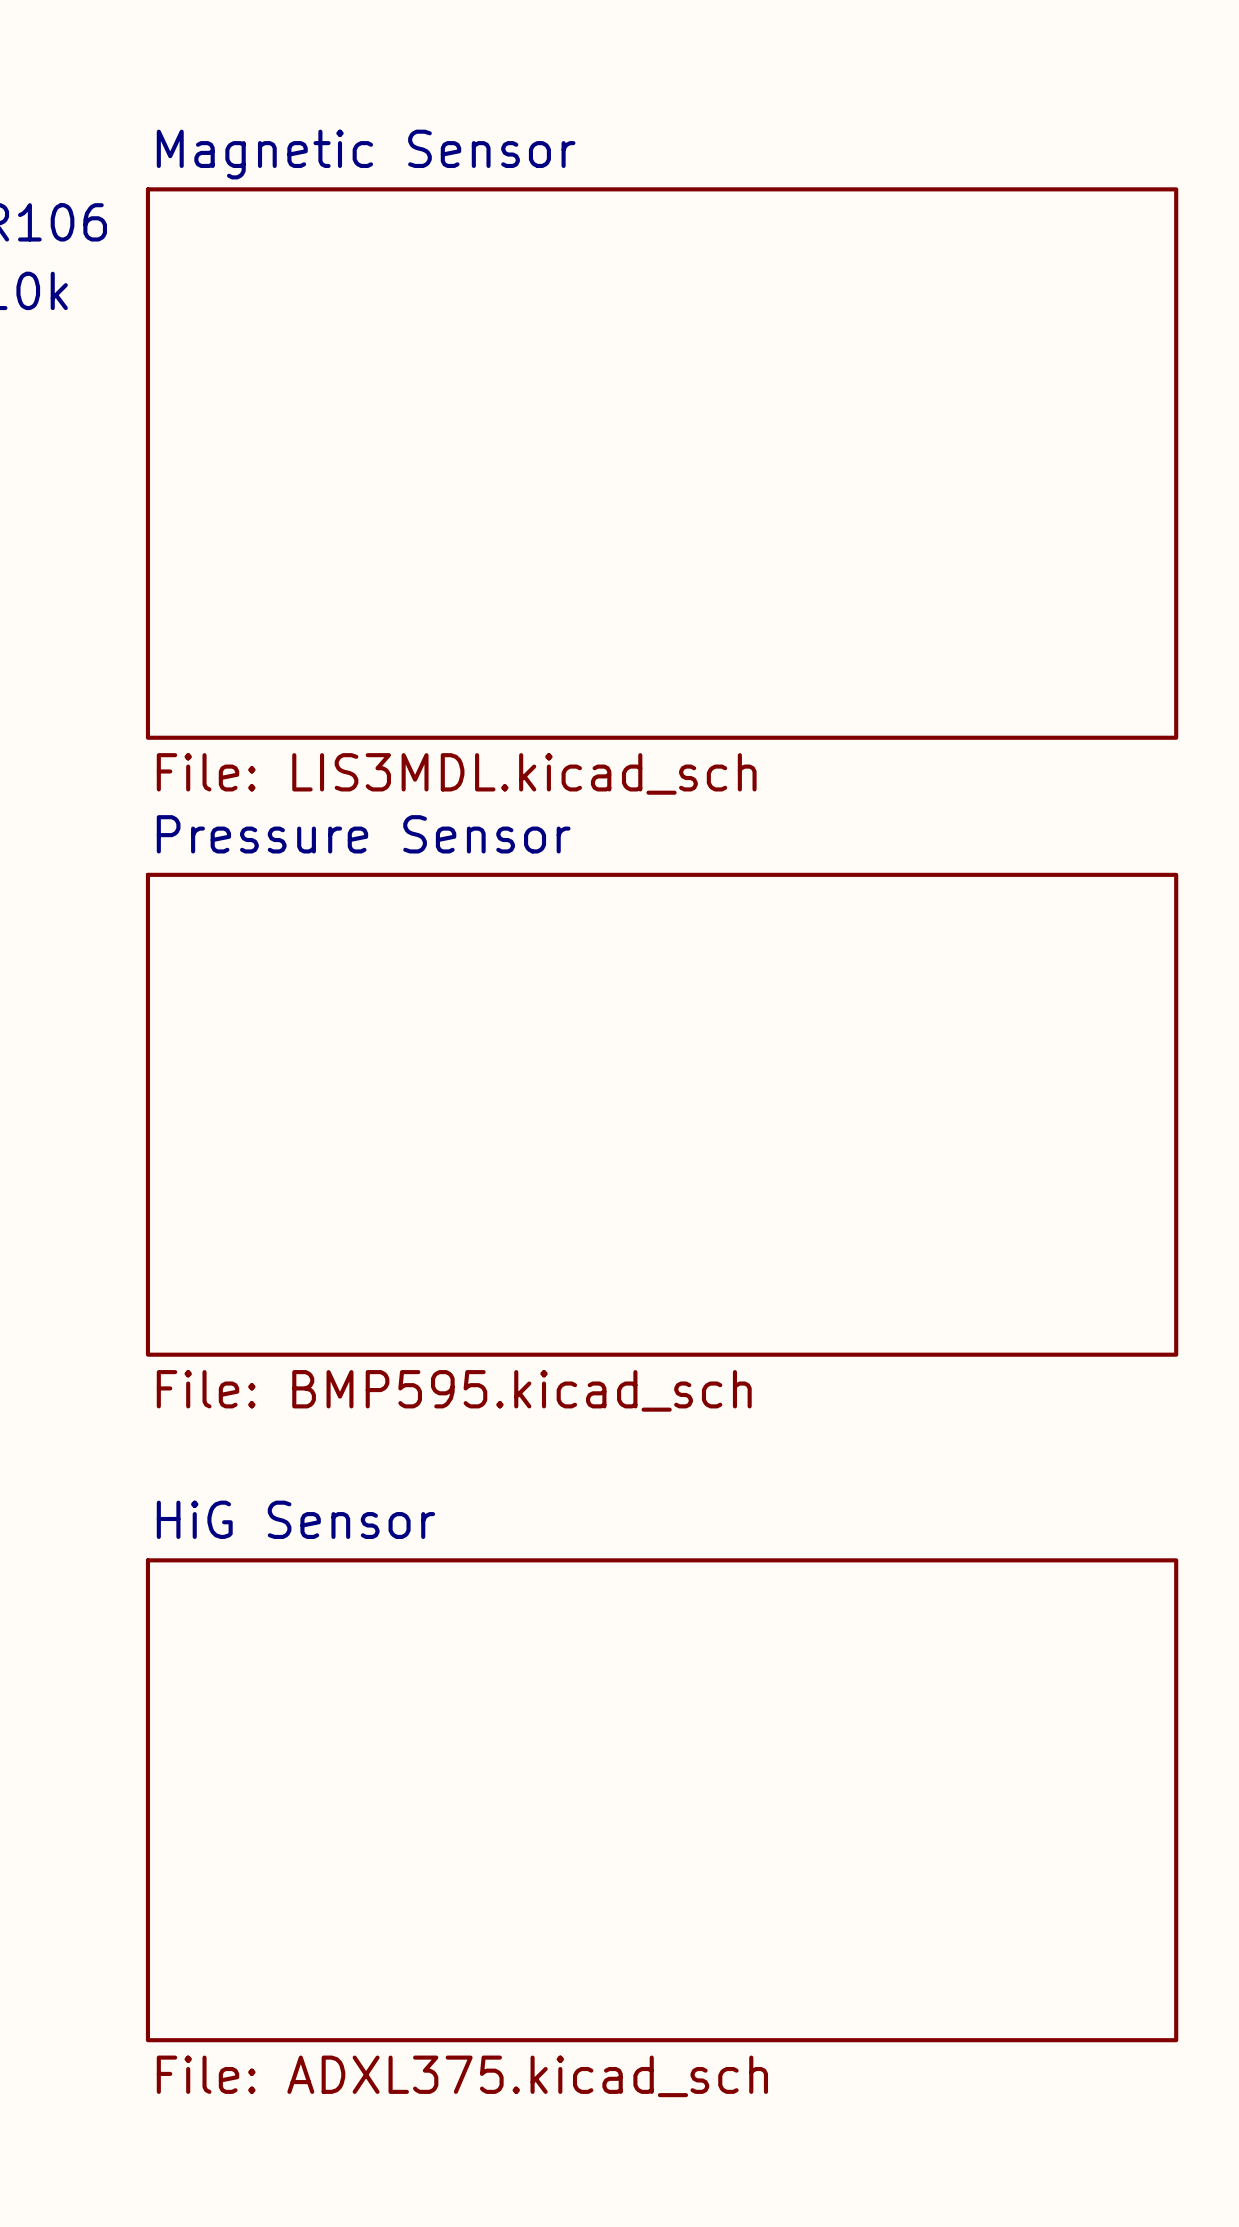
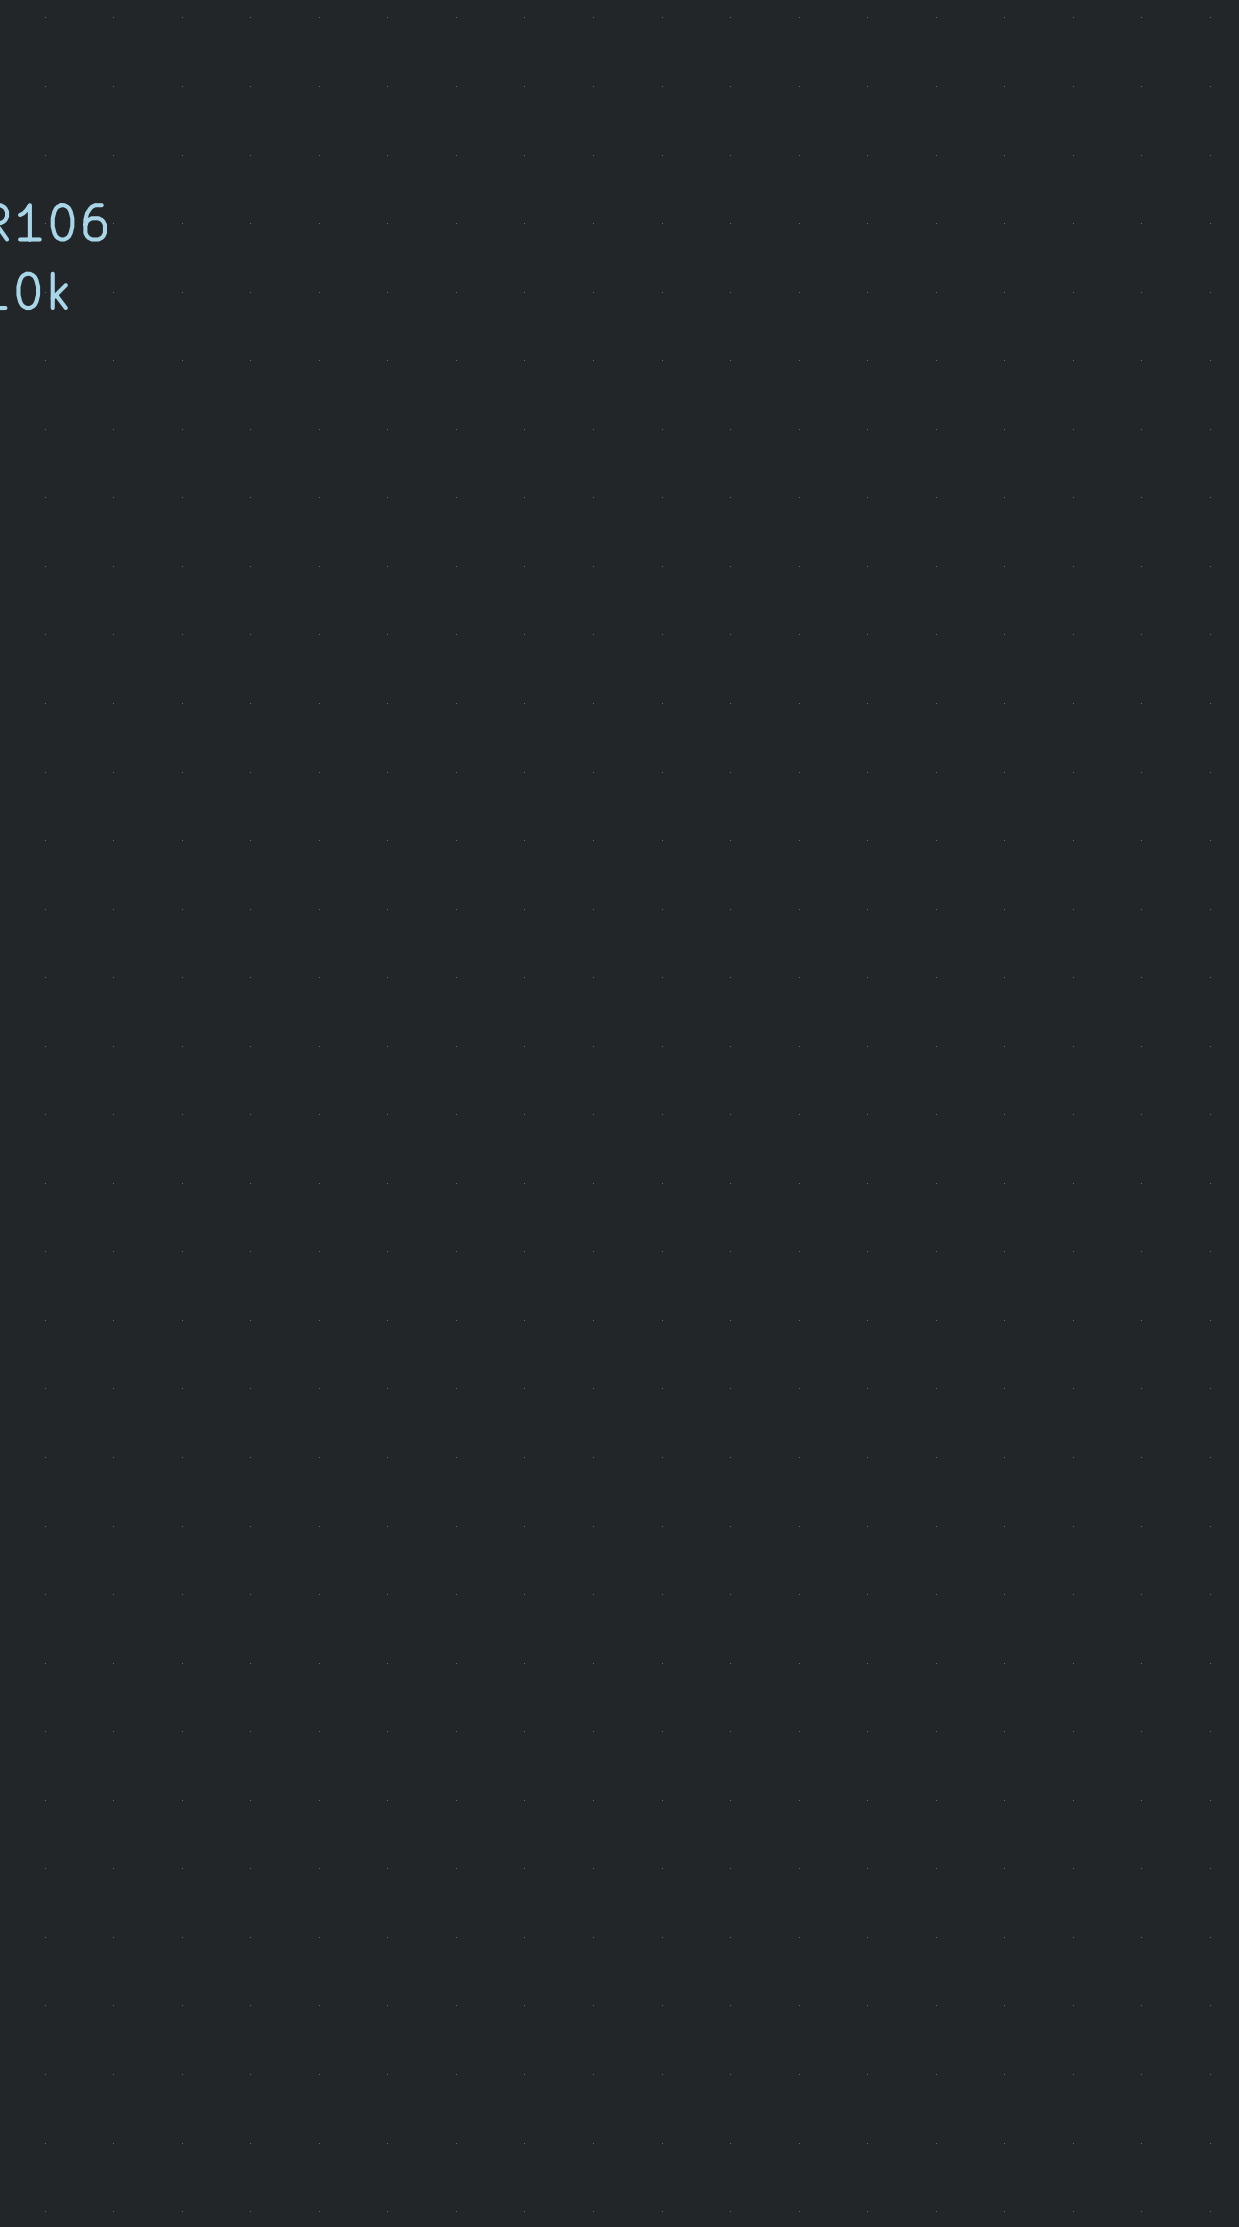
sheet Magnetic Sensor: File: LIS3MDL.kicad_sch (662, 463) -> none
sheet Pressure Sensor: File: BMP595.kicad_sch (662, 1114) -> none
sheet HiG Sensor: File: ADXL375.kicad_sch (662, 1800) -> none

